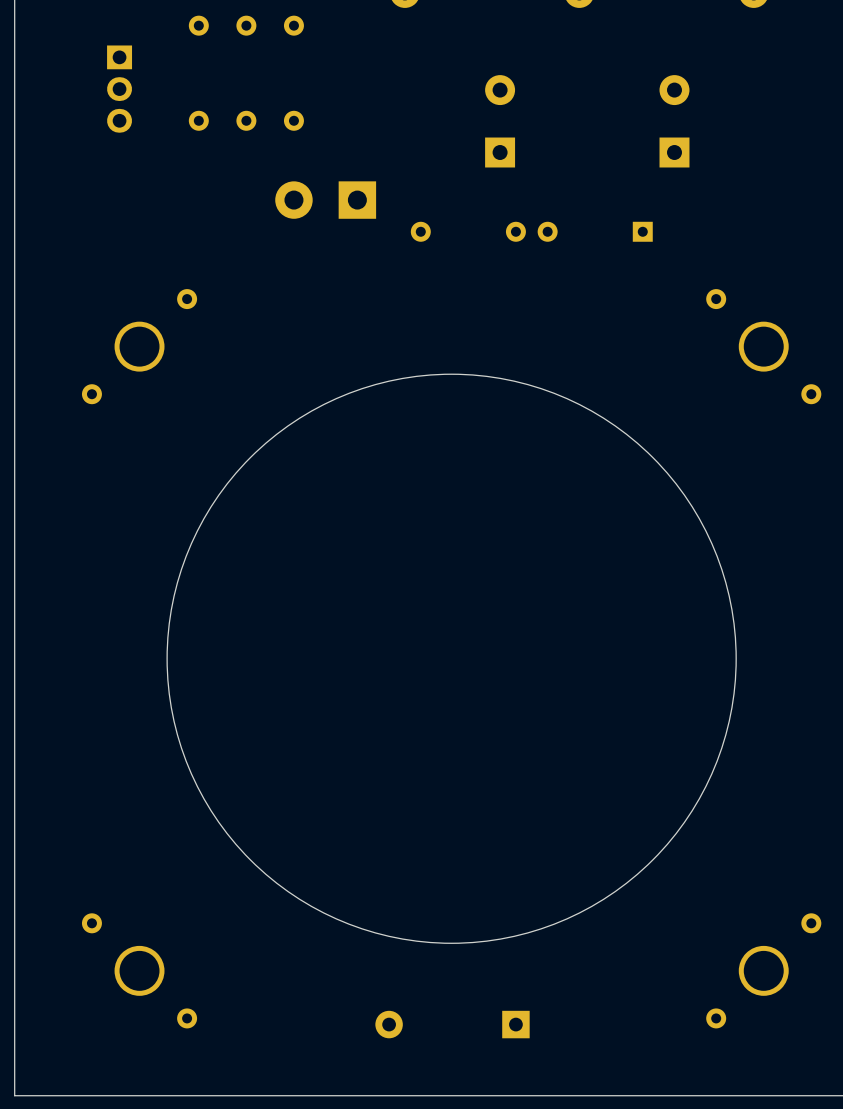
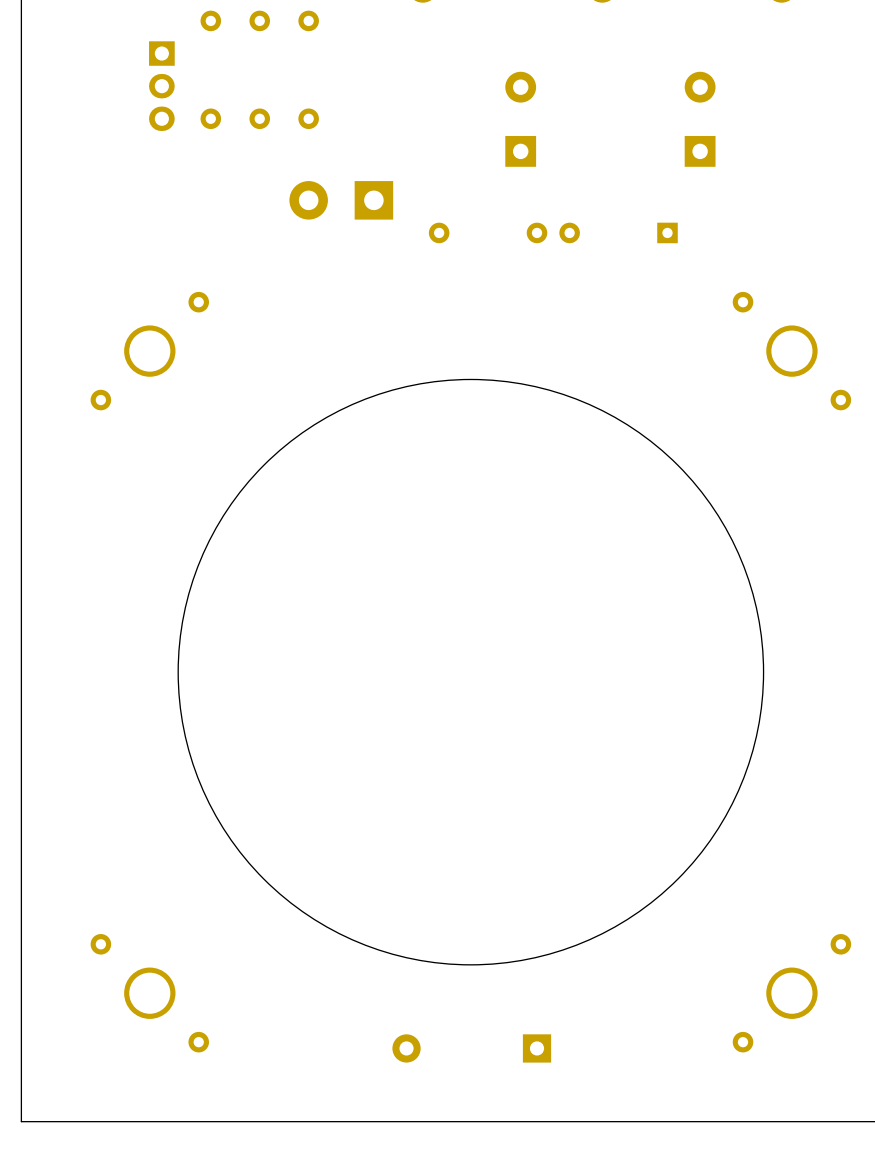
part position: (119, 89) -> (161, 86)

